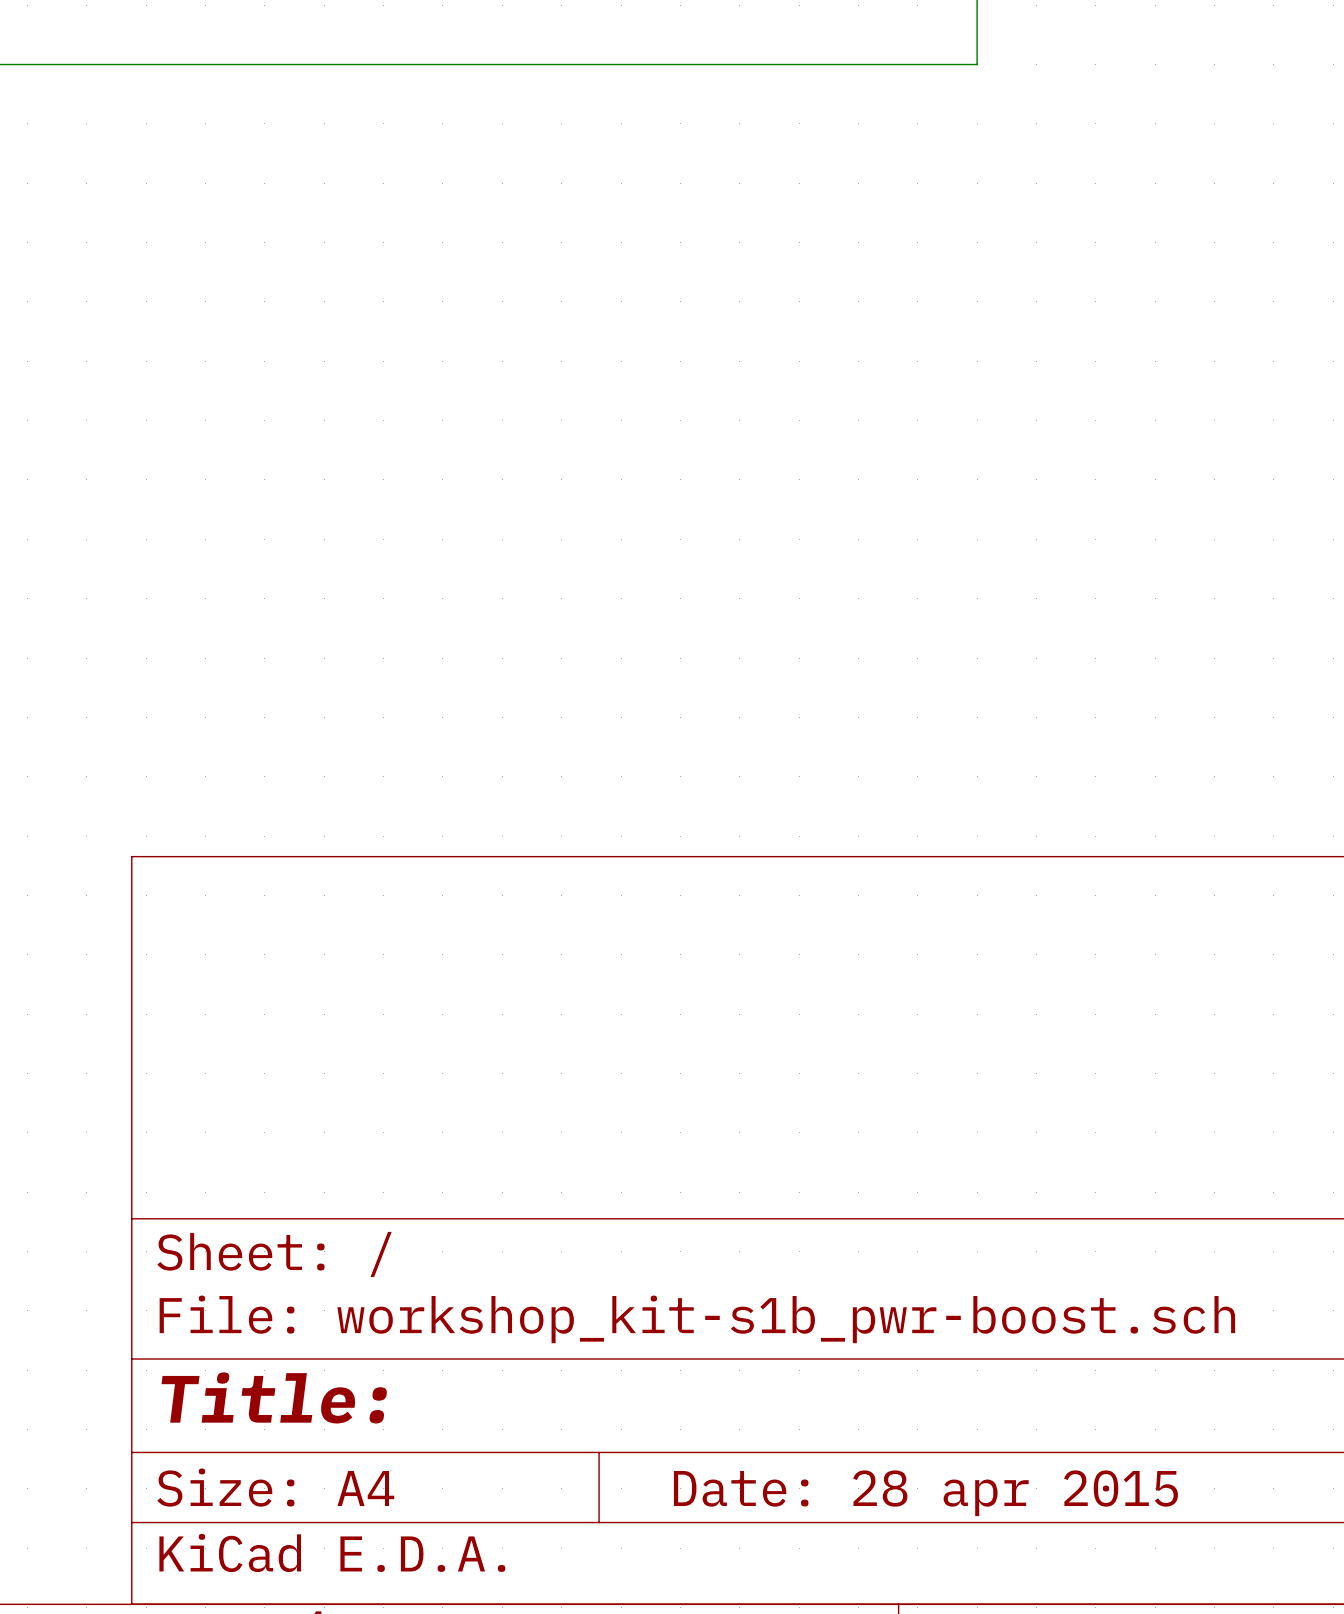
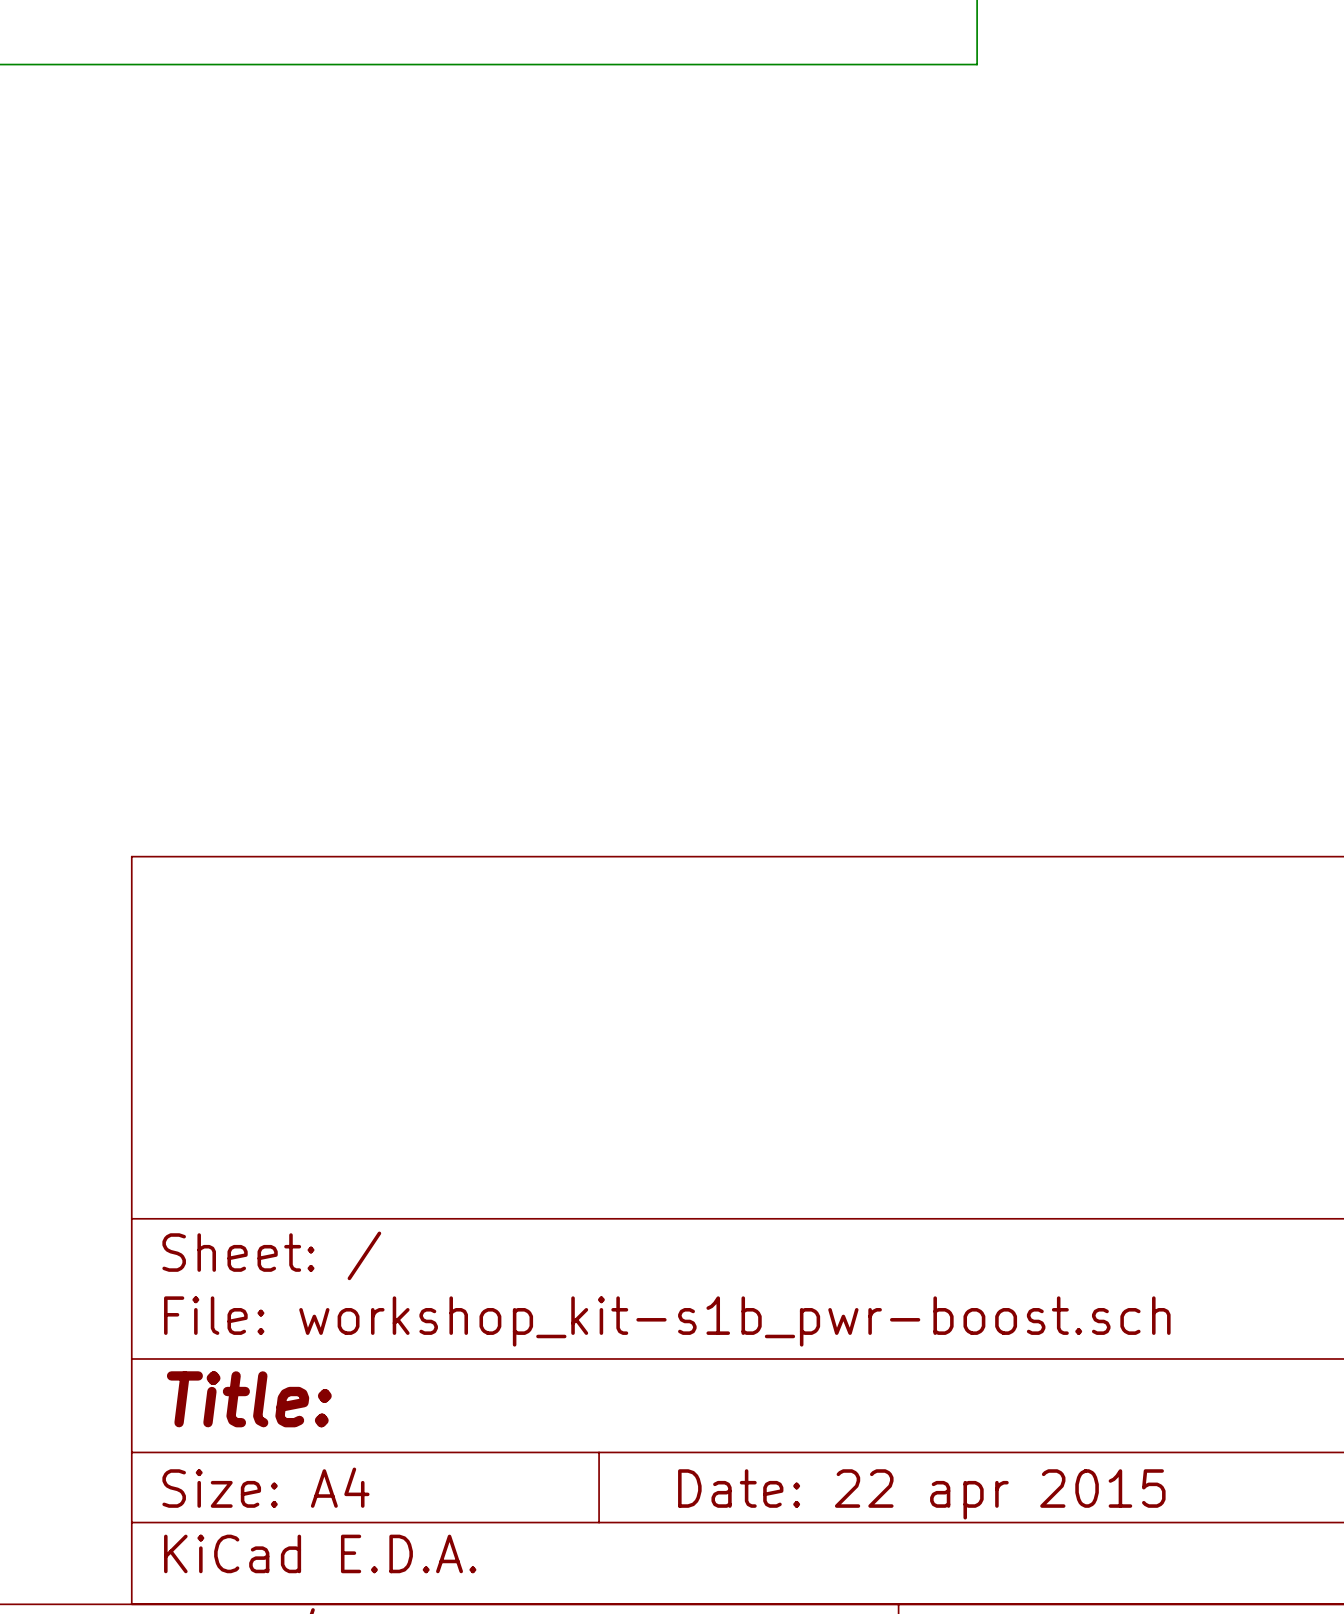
title block: Date: 28 apr 2015 (925, 1493) -> Date: 22 apr 2015 (921, 1494)

